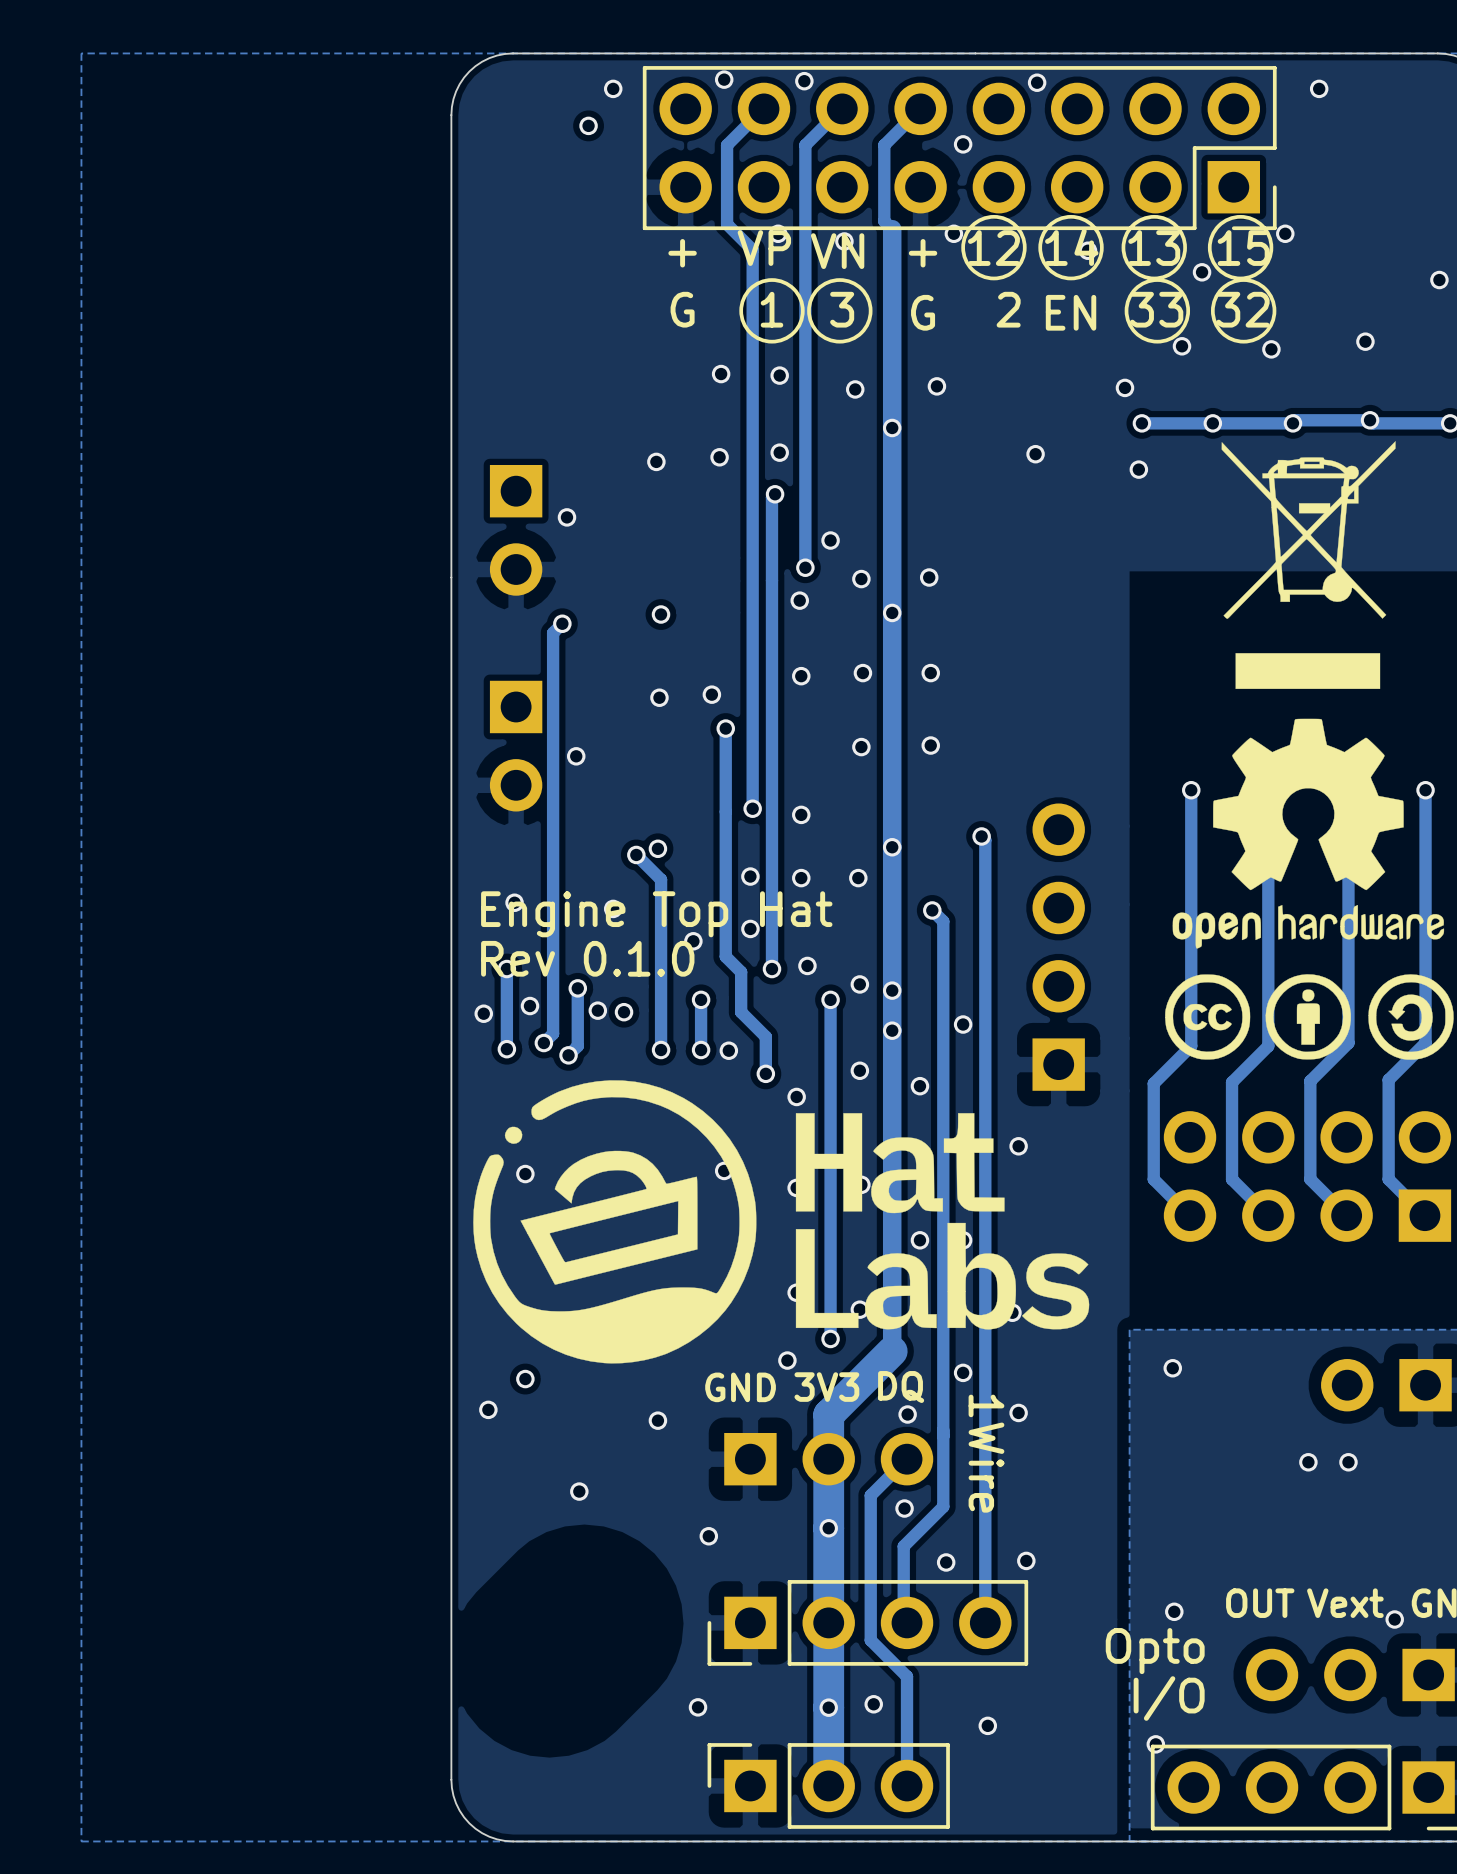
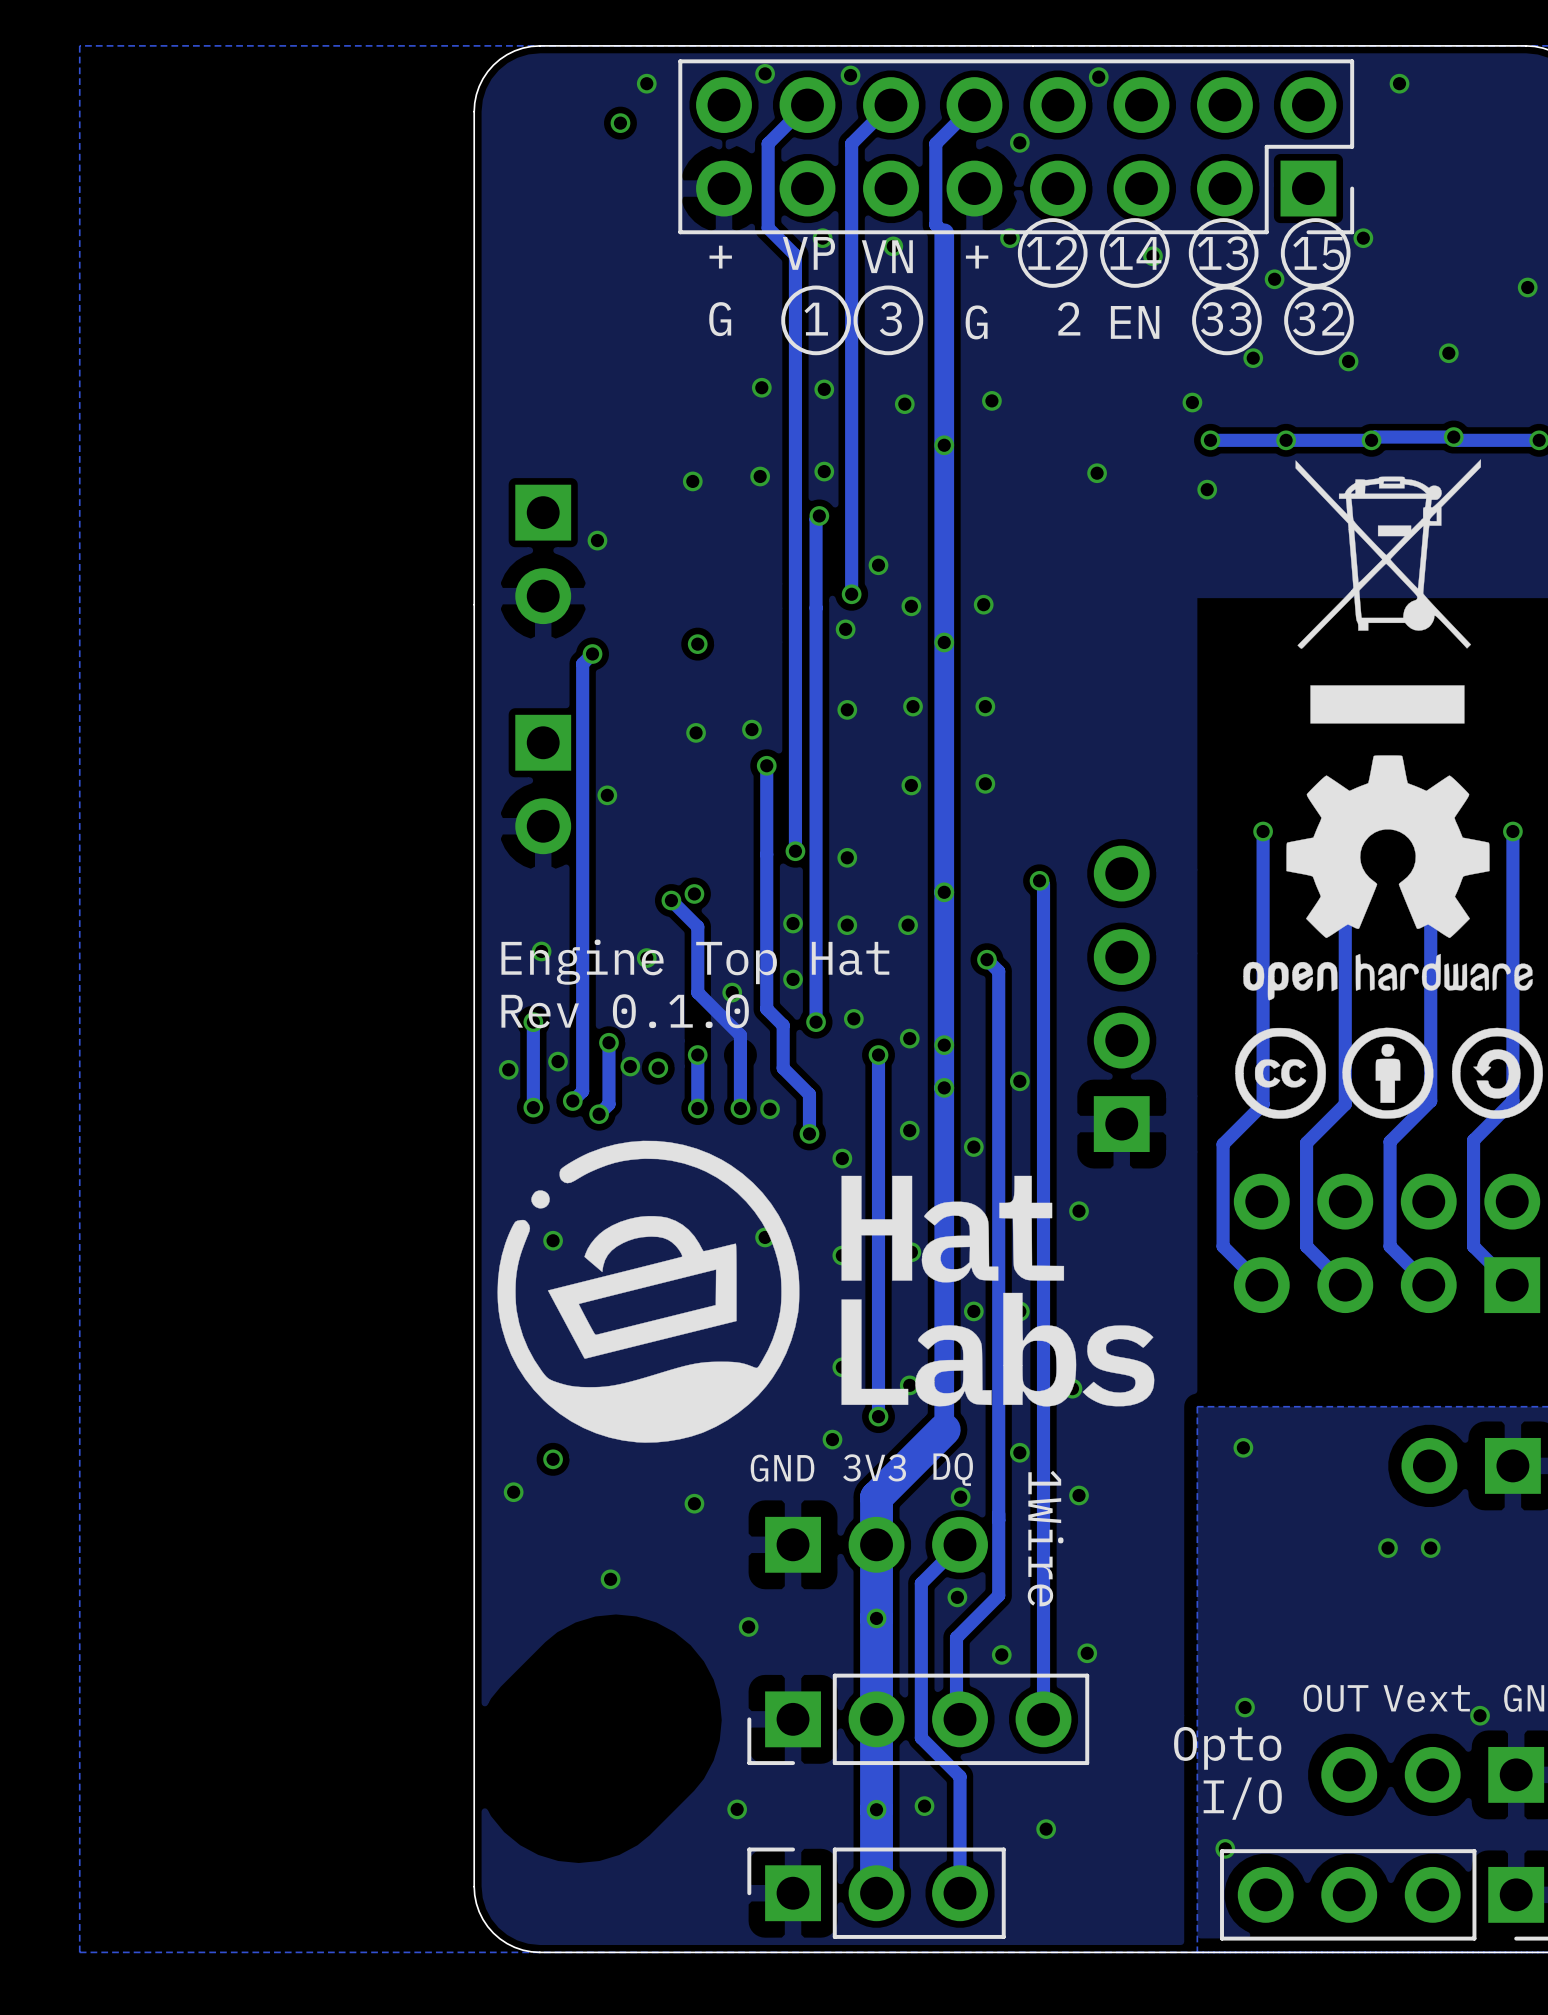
track: (661, 941) (661, 999) -> (697, 992) (740, 1035) (740, 1055)
via position: (701, 999) -> (697, 1055)

